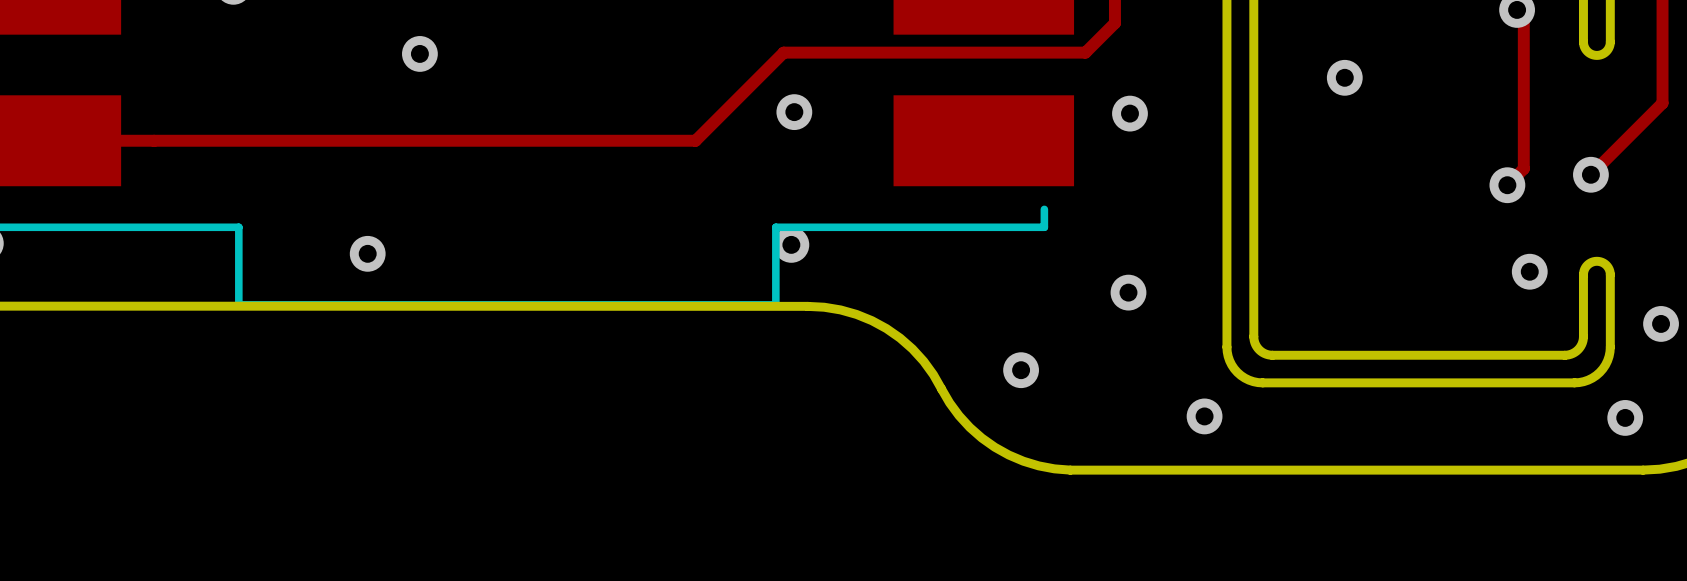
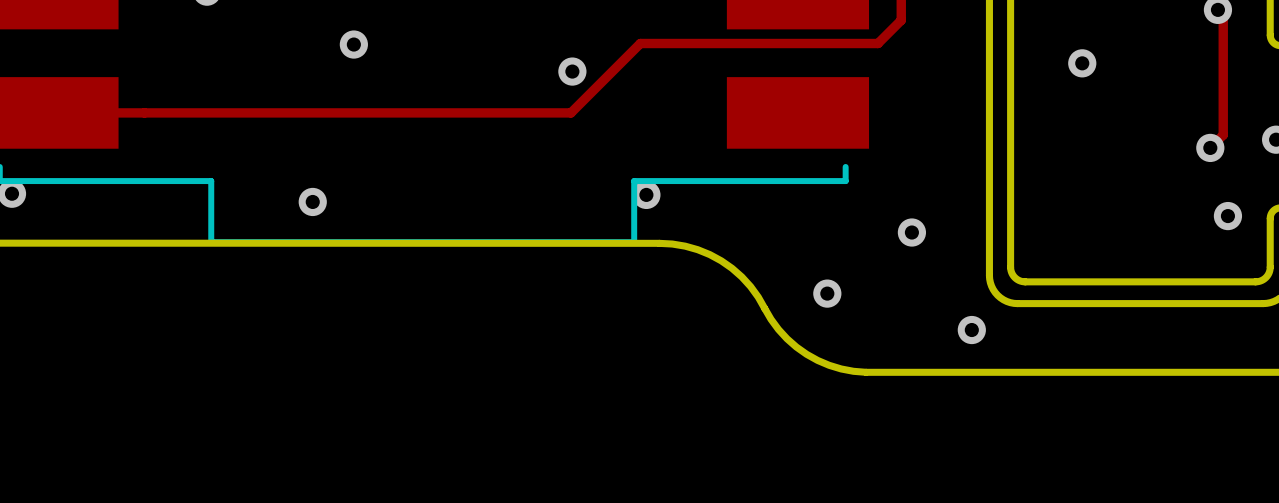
via position: (794, 112) -> (572, 71)
via: (1129, 113) -> none

